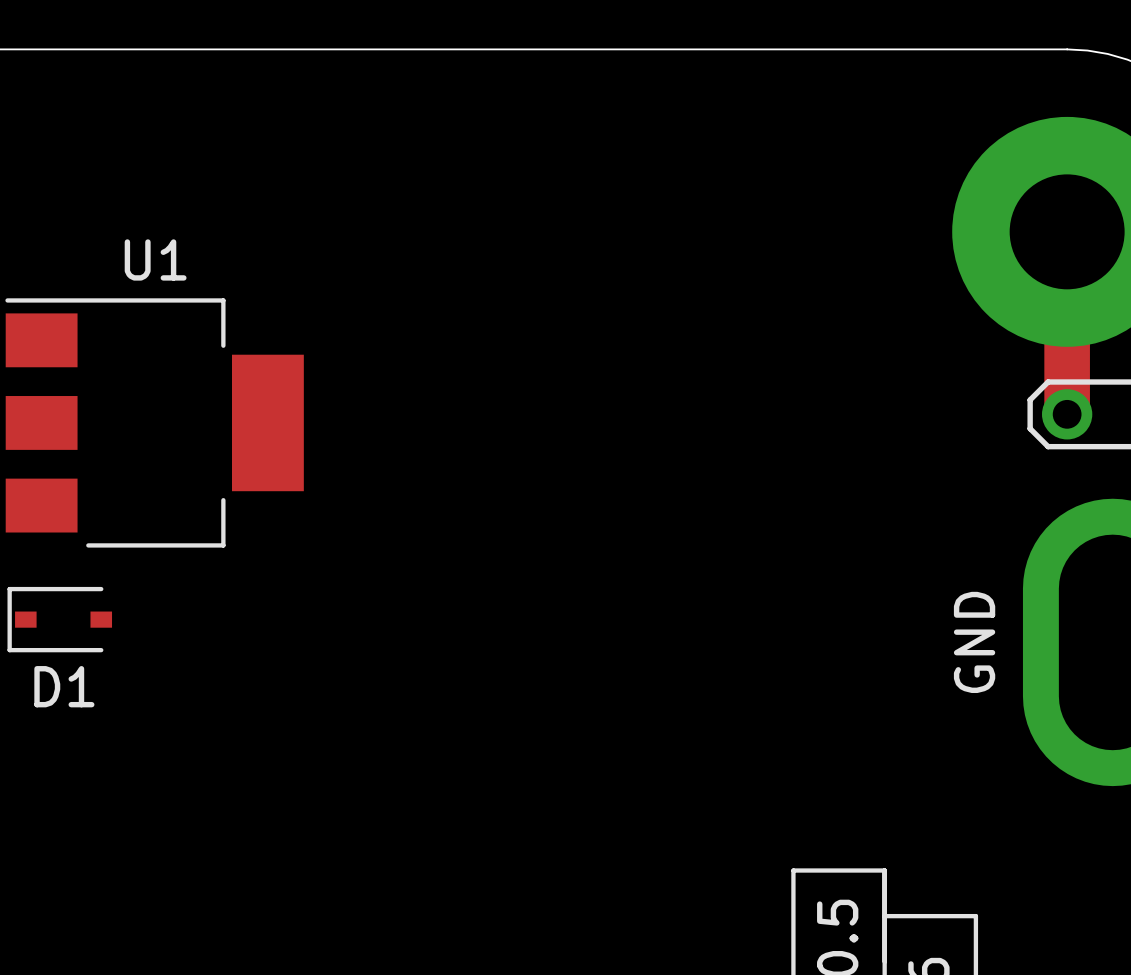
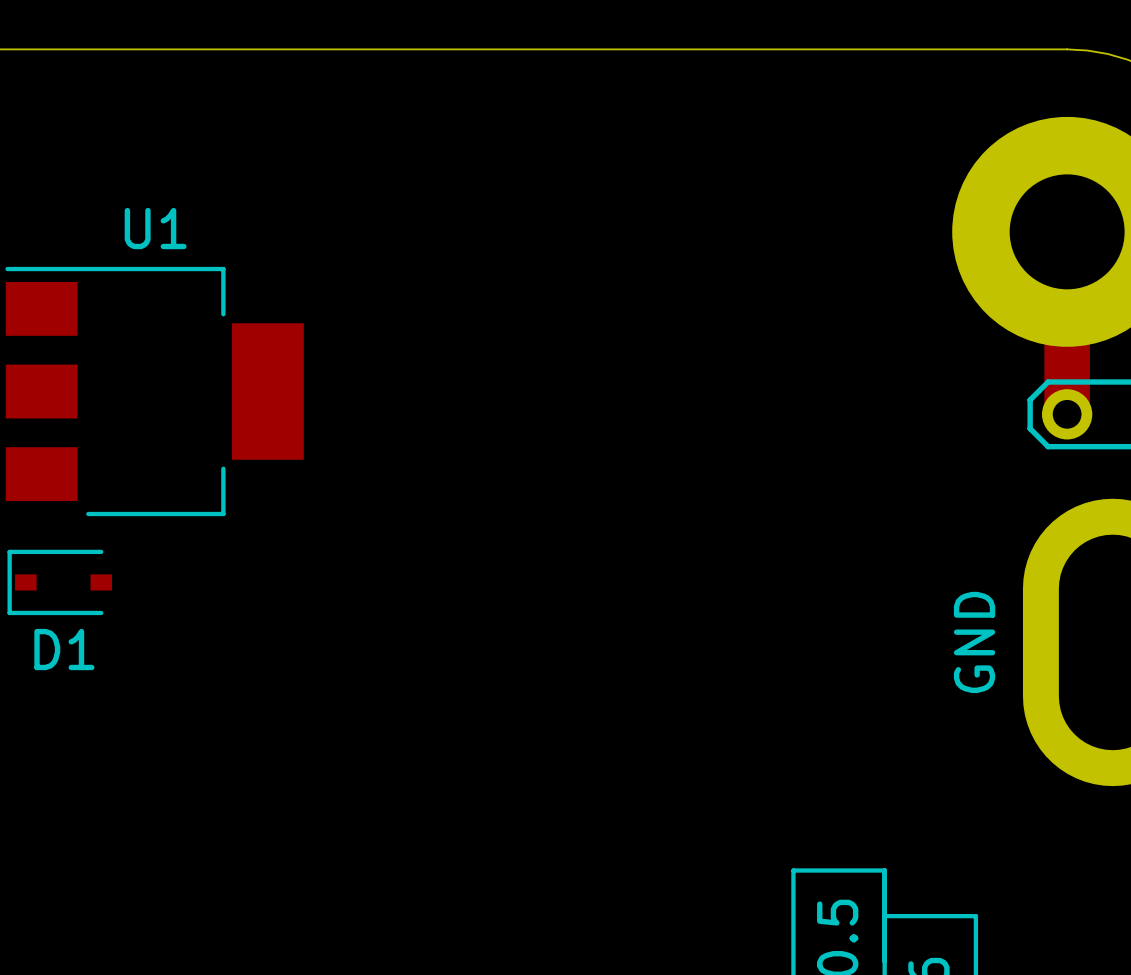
U1 position: (154, 422) -> (154, 391)
D1 position: (59, 619) -> (59, 582)

